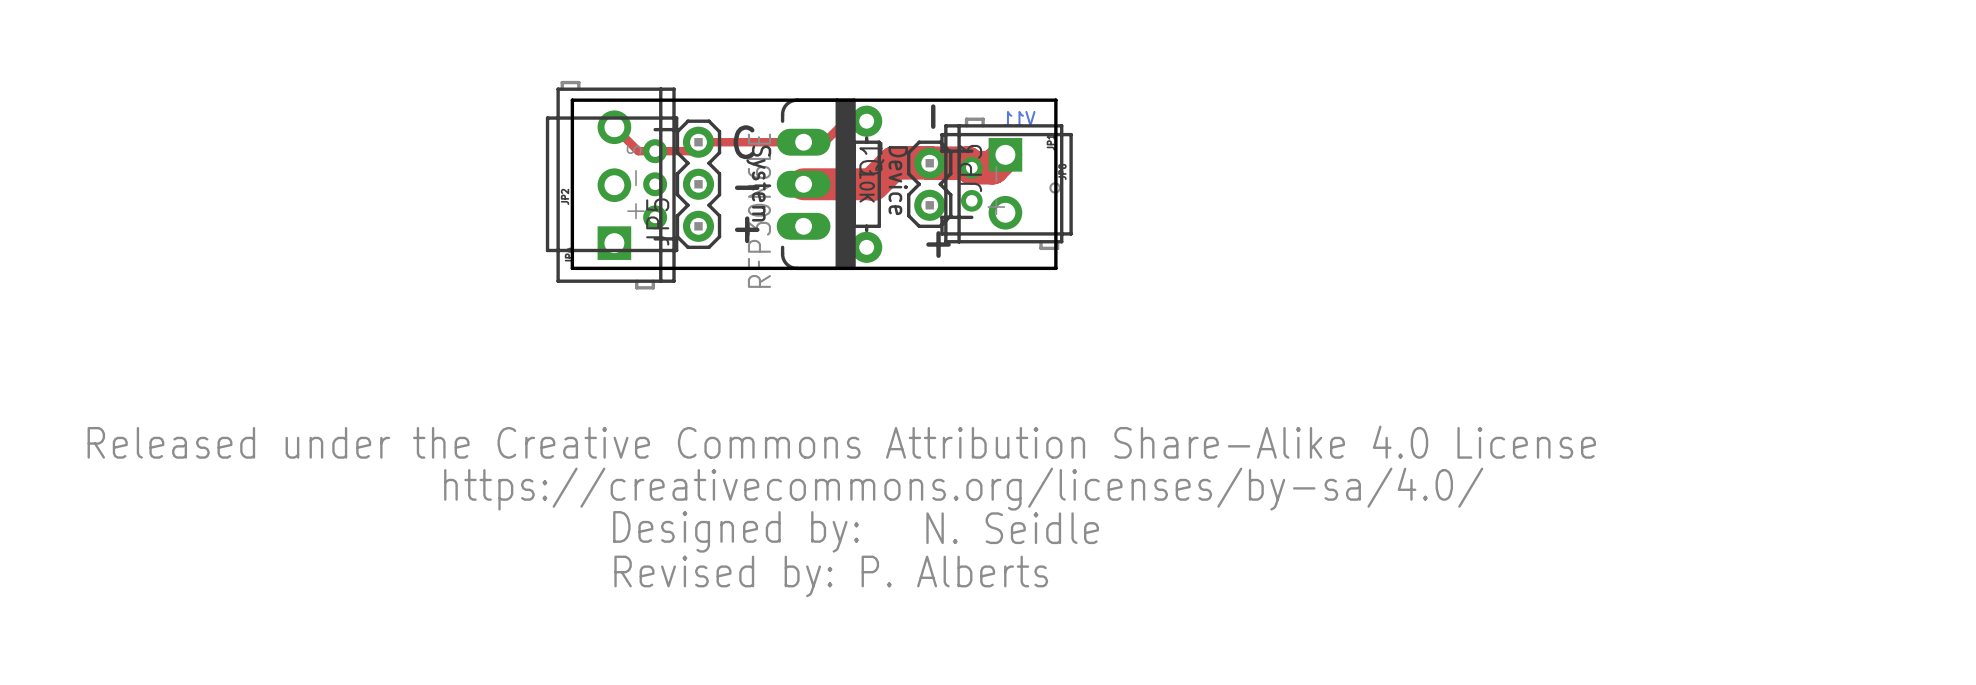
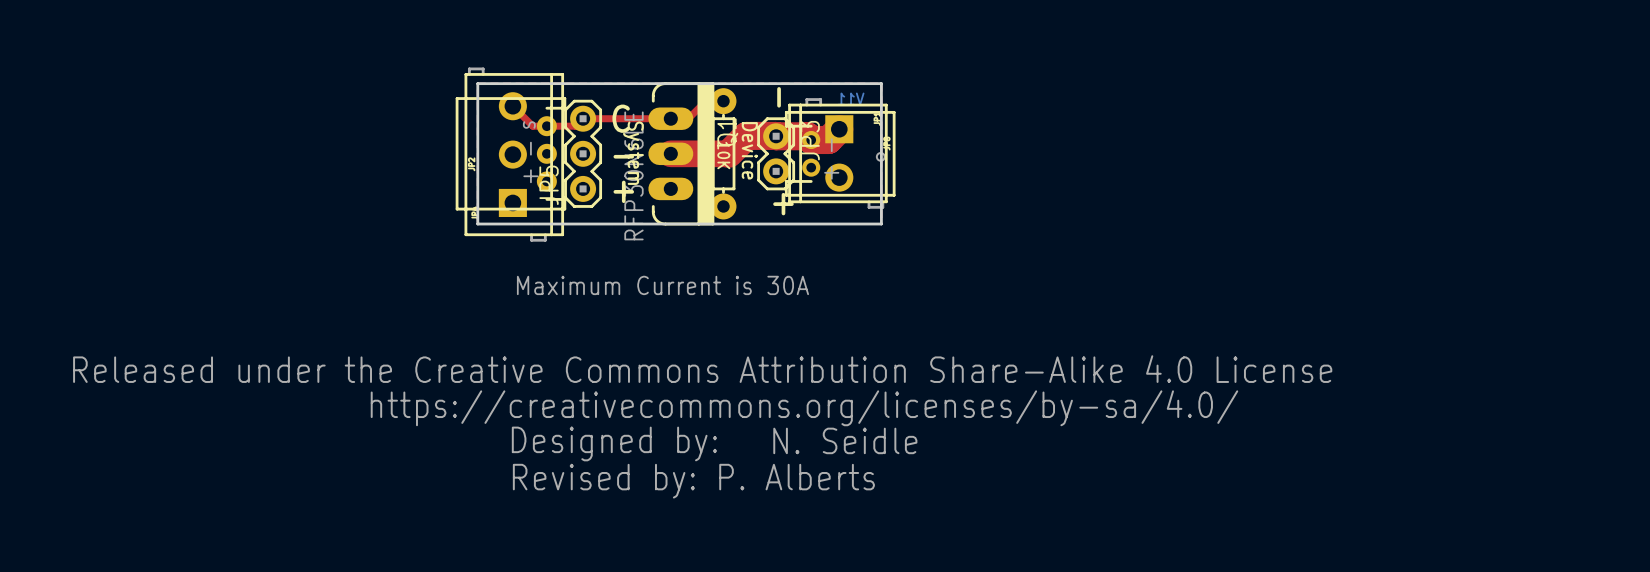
text: none -> Maximum Current is 30A (662, 285)

